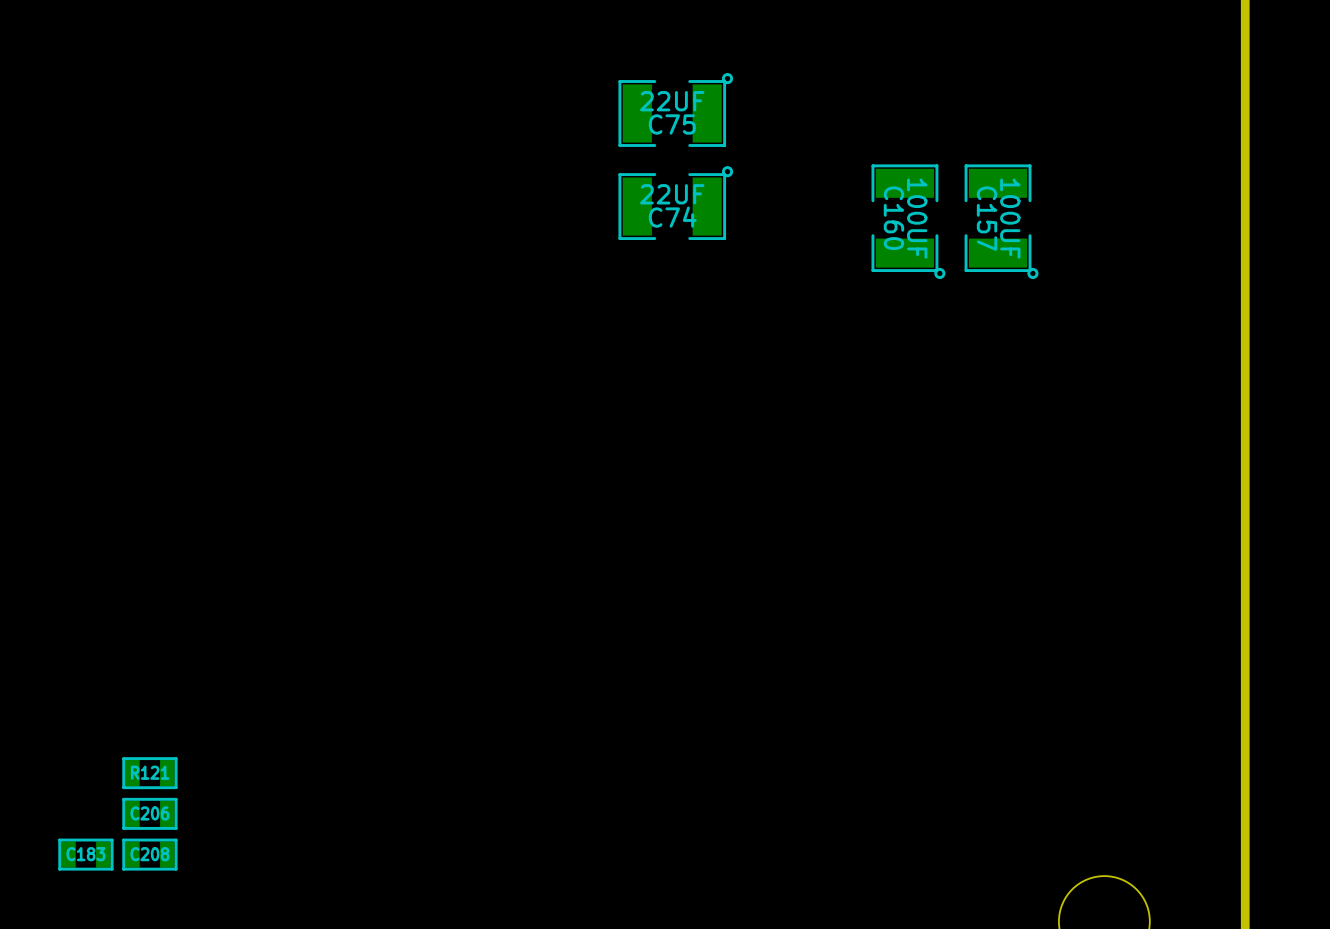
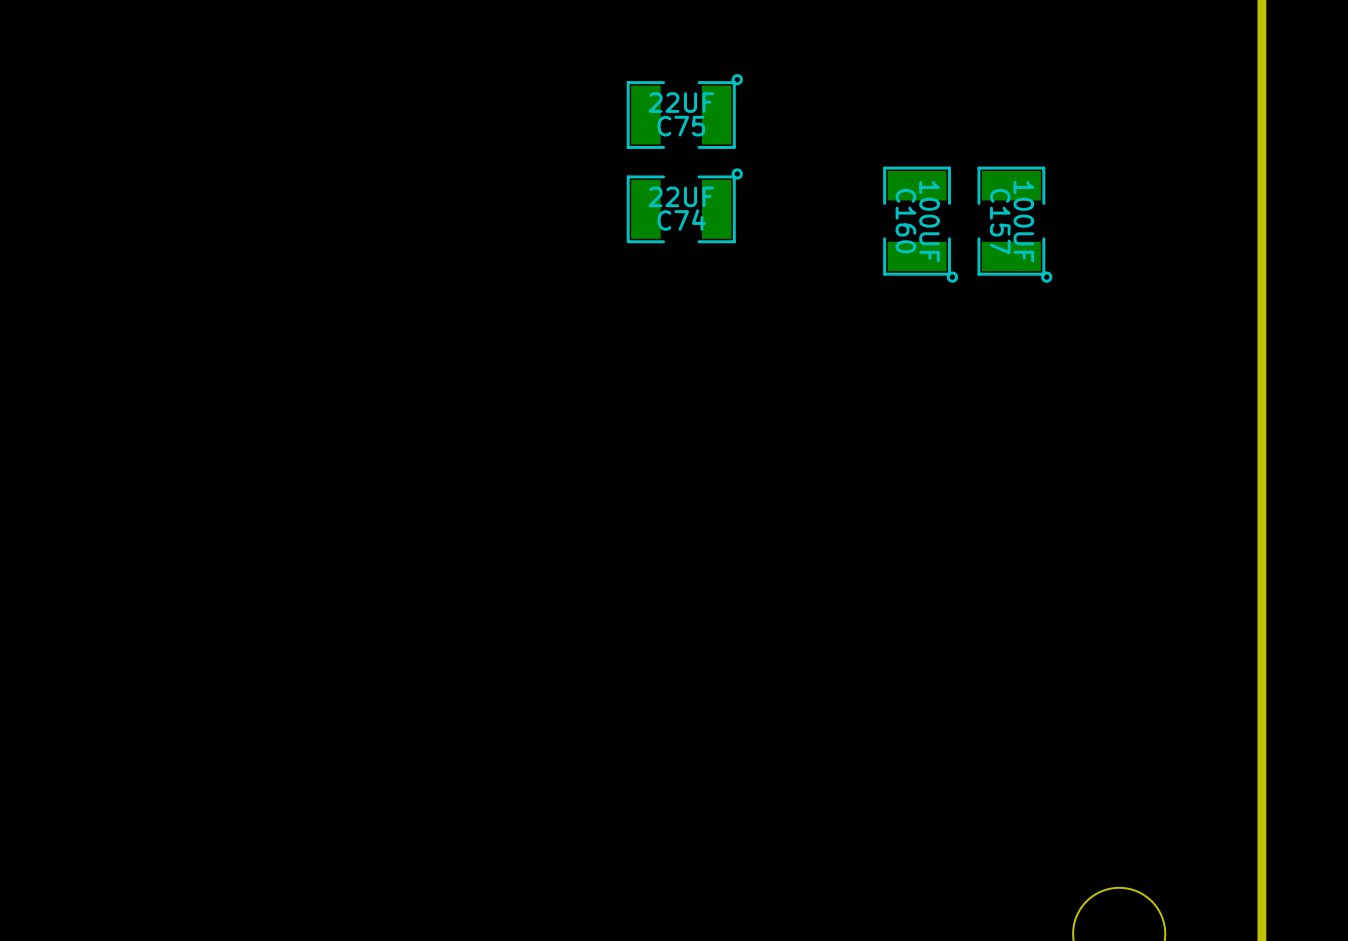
R121: (149, 773) -> none
C206: (149, 813) -> none
C183: (85, 854) -> none
C208: (149, 854) -> none

